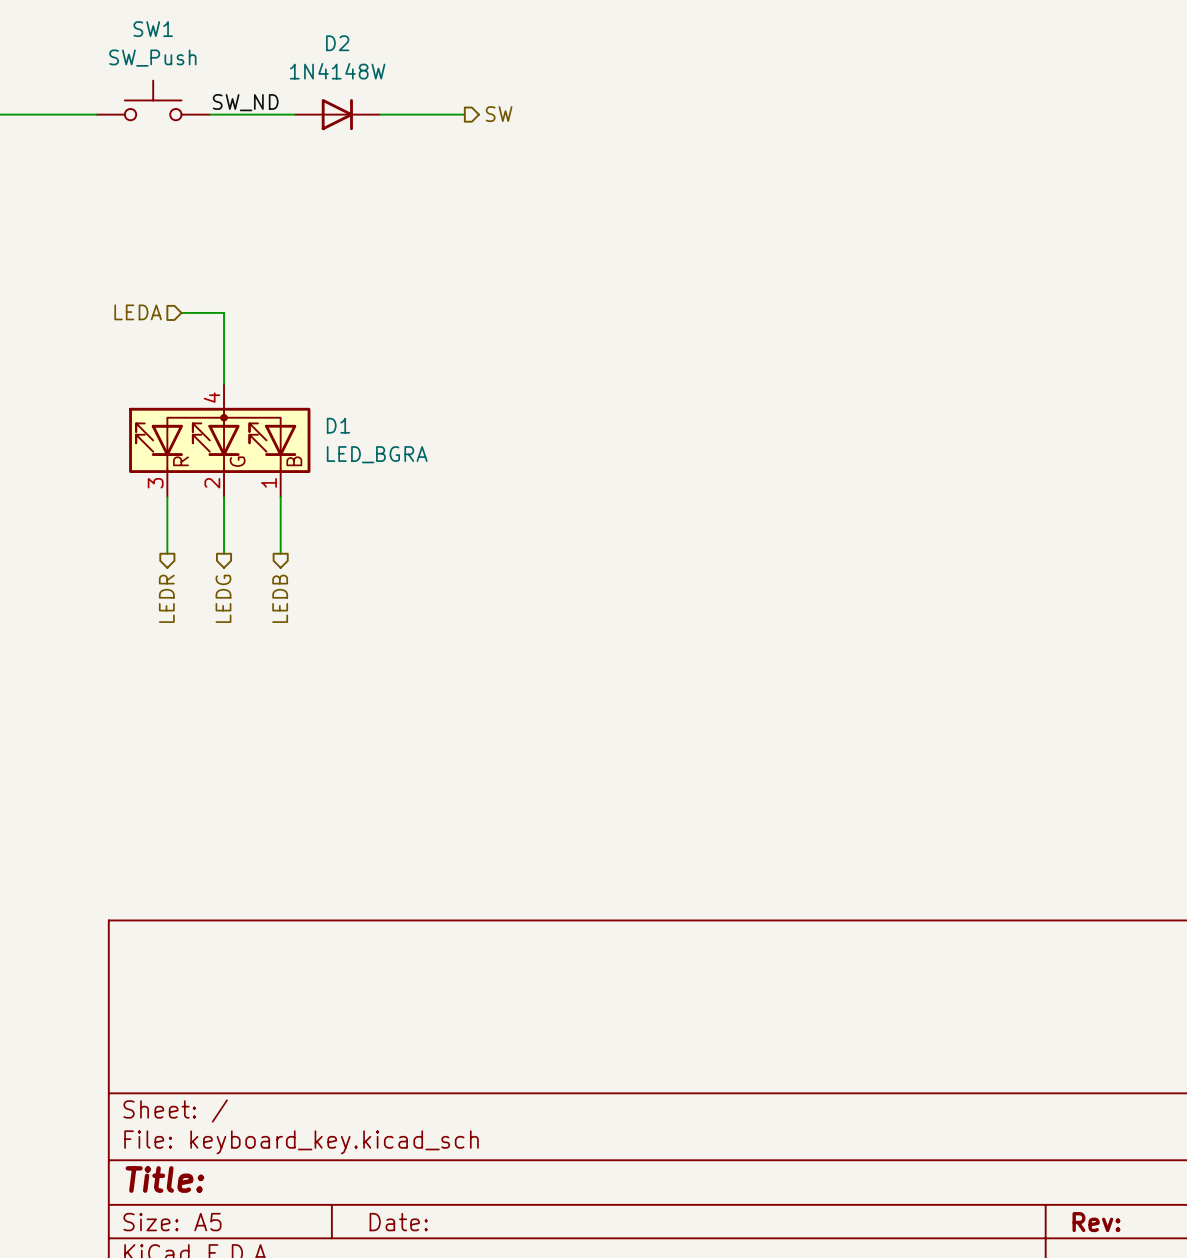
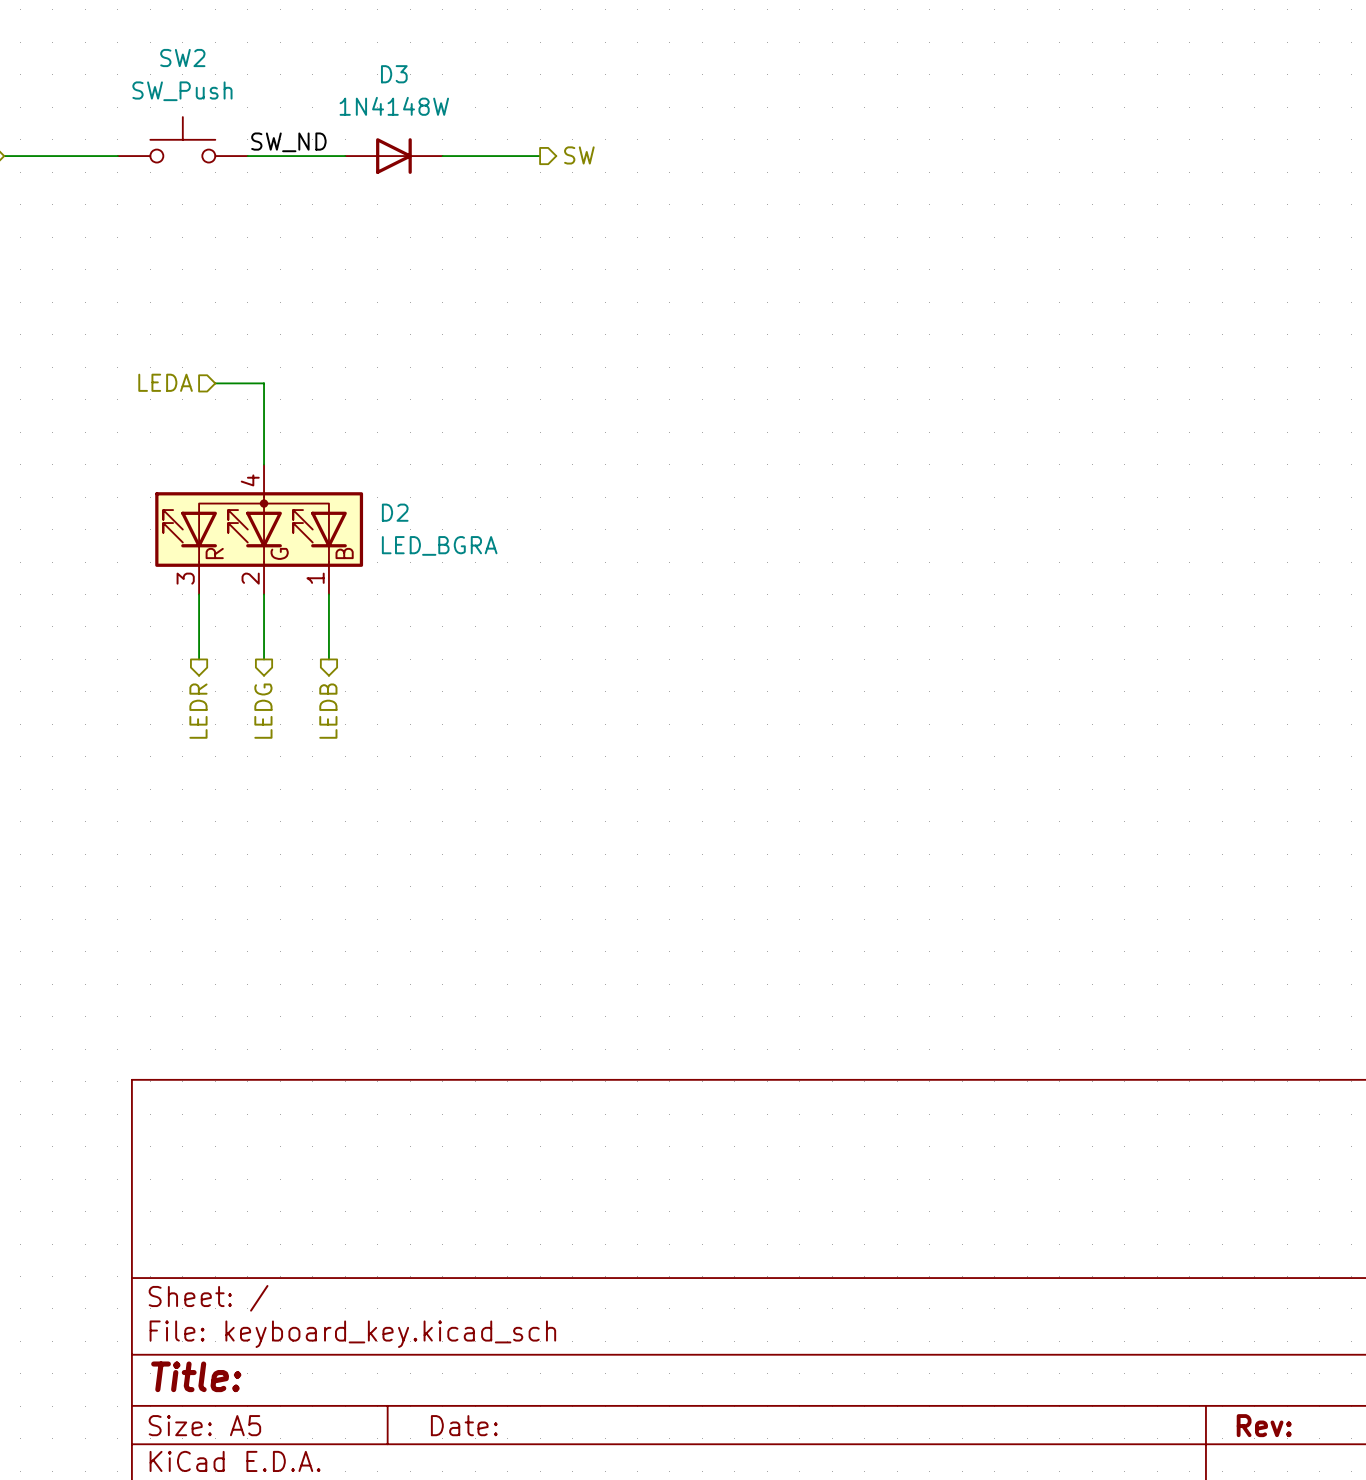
SW1 name: SW1 (153, 29) -> SW2 (182, 58)
D2 name: D2 (337, 43) -> D3 (394, 74)
D1 name: D1 (338, 425) -> D2 (395, 512)

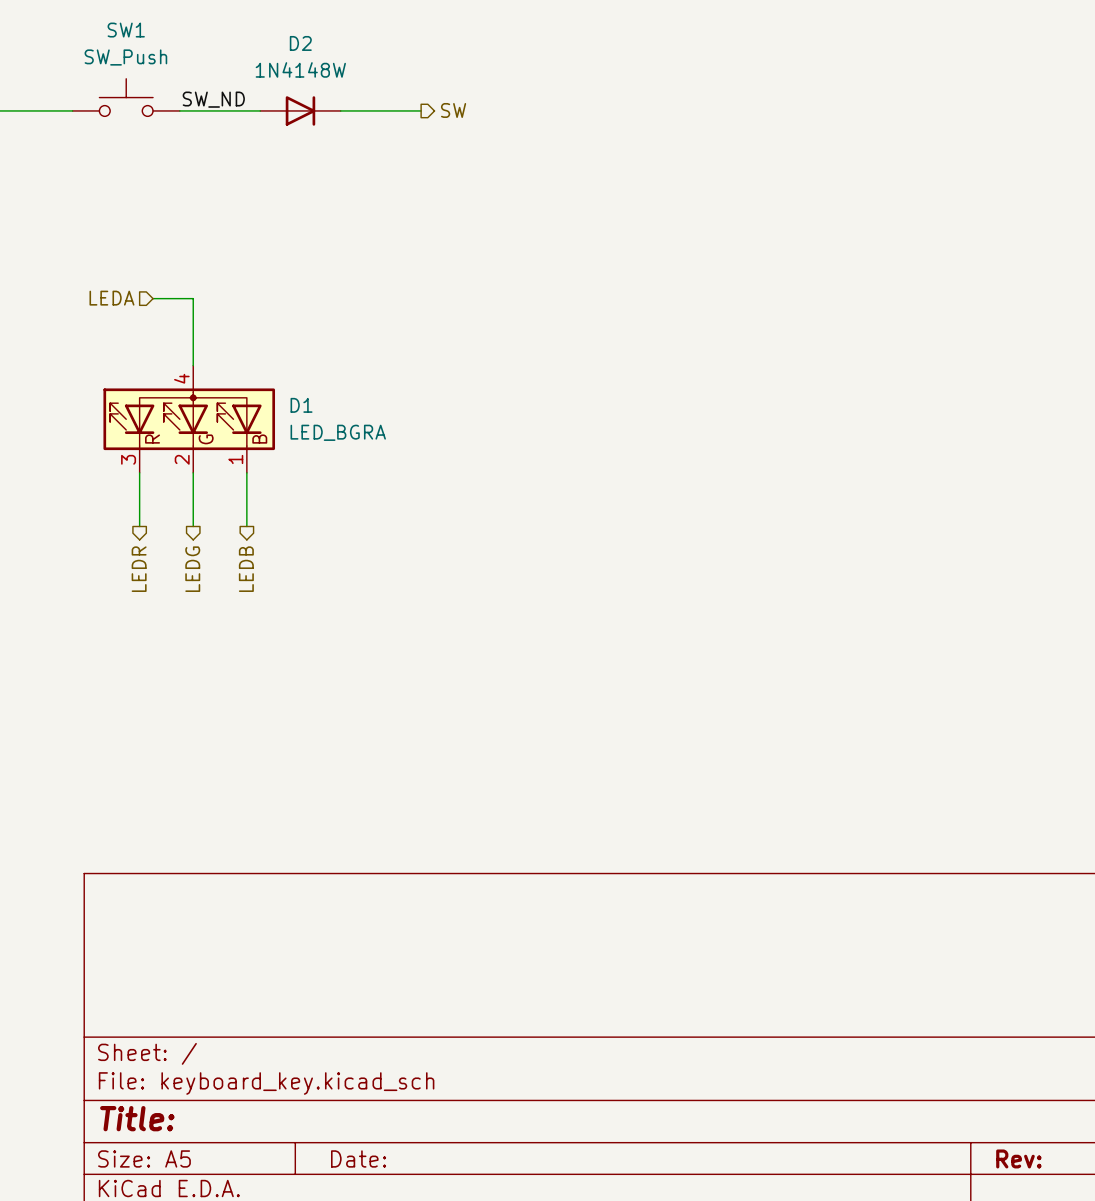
SW2 name: SW2 (182, 58) -> SW1 (126, 30)
D3 name: D3 (394, 74) -> D2 (300, 43)
D2 name: D2 (395, 512) -> D1 (301, 405)

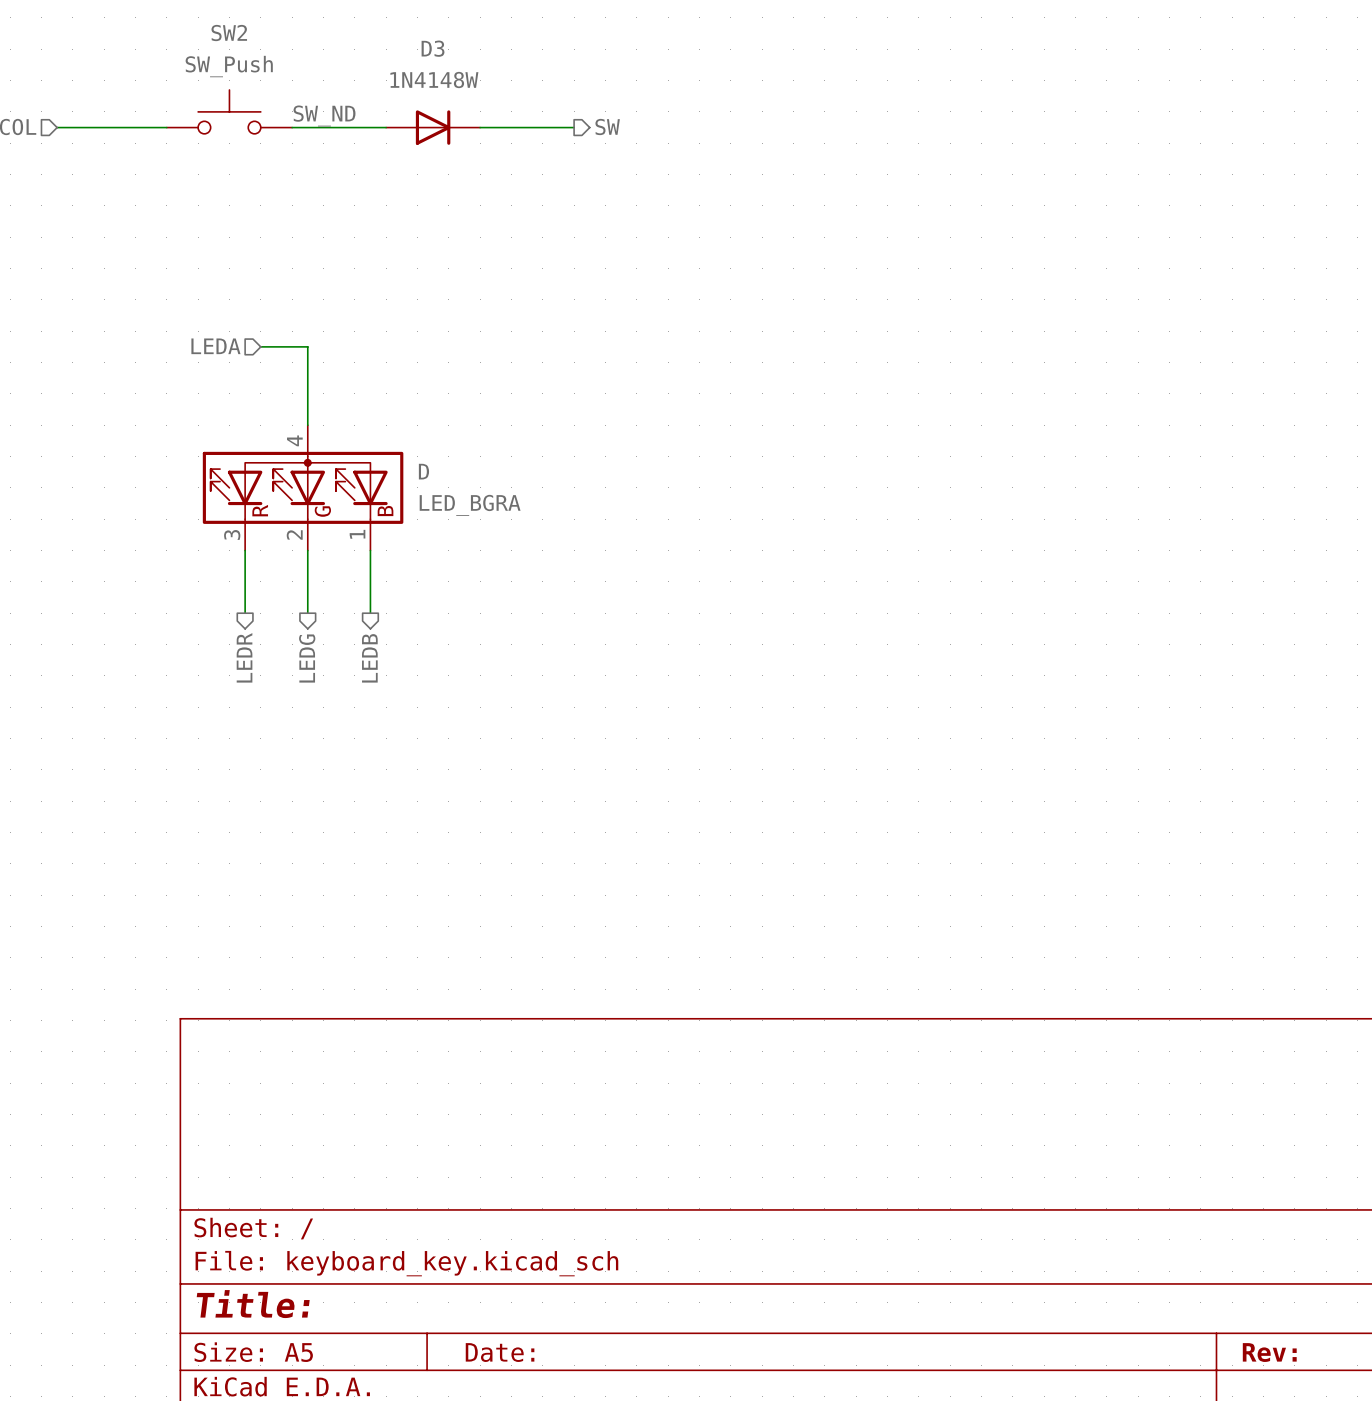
SW1 name: SW1 (126, 30) -> SW2 (229, 33)
D2 name: D2 (300, 43) -> D3 (433, 48)
D1 name: D1 (301, 405) -> D (423, 471)

